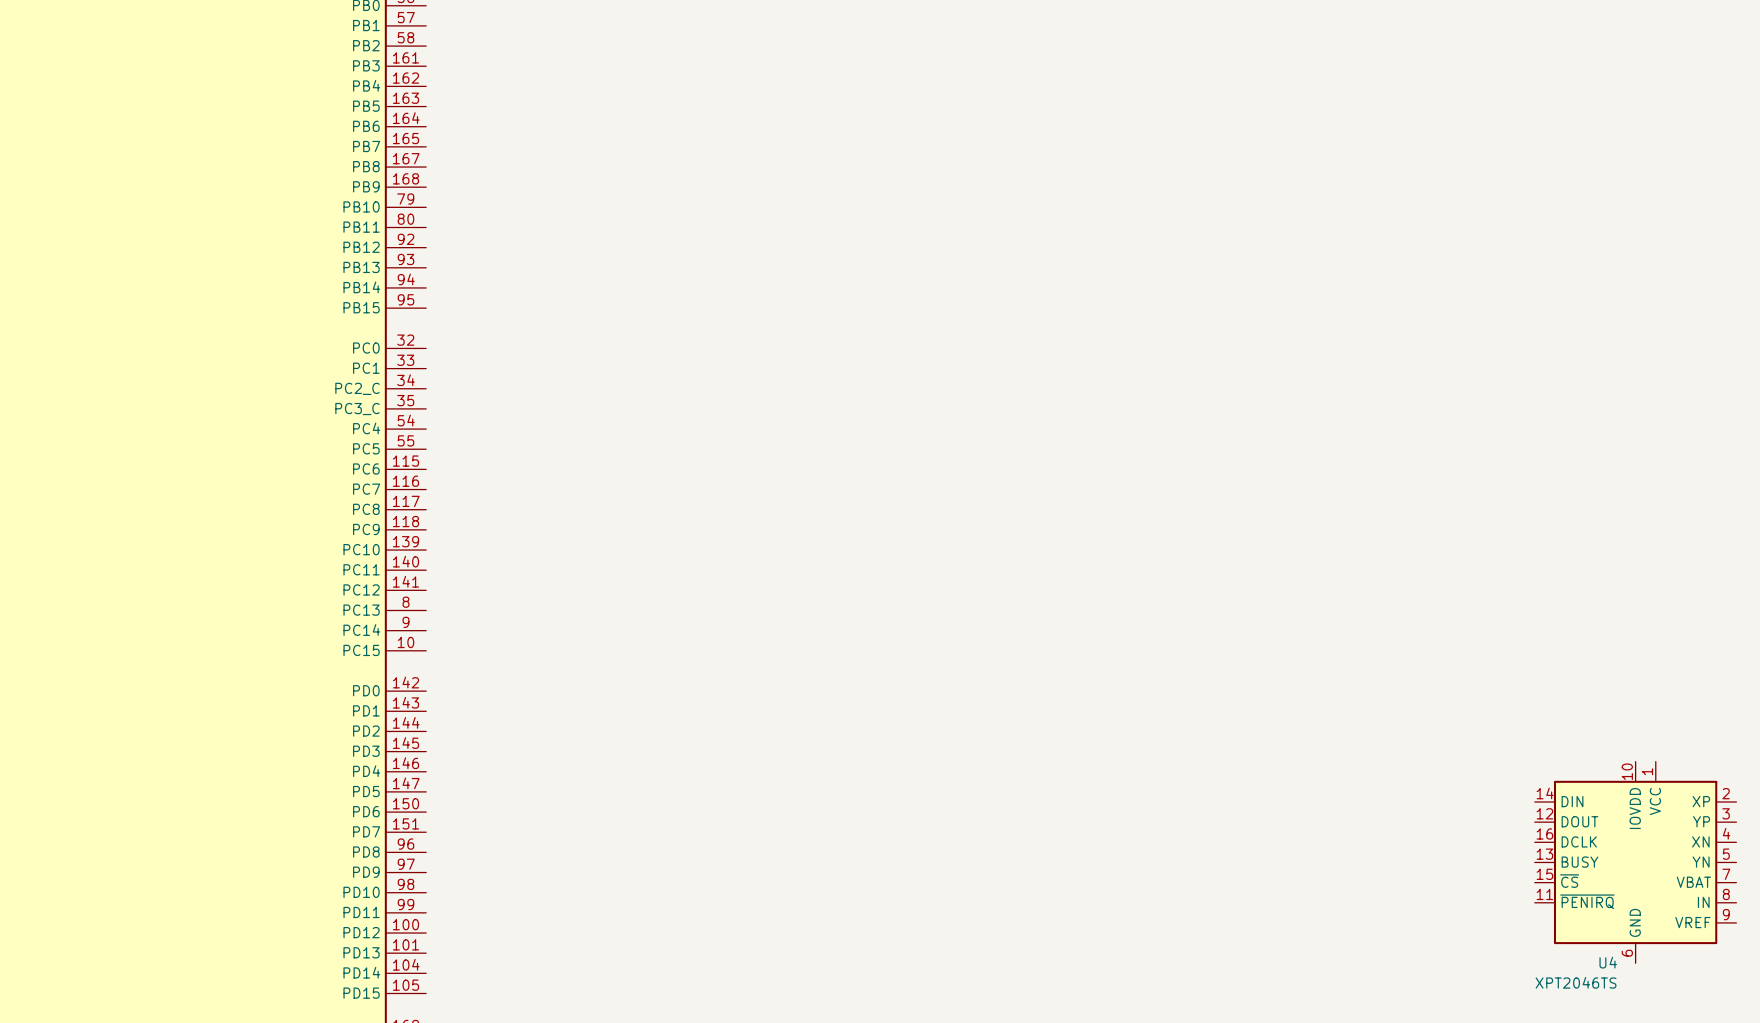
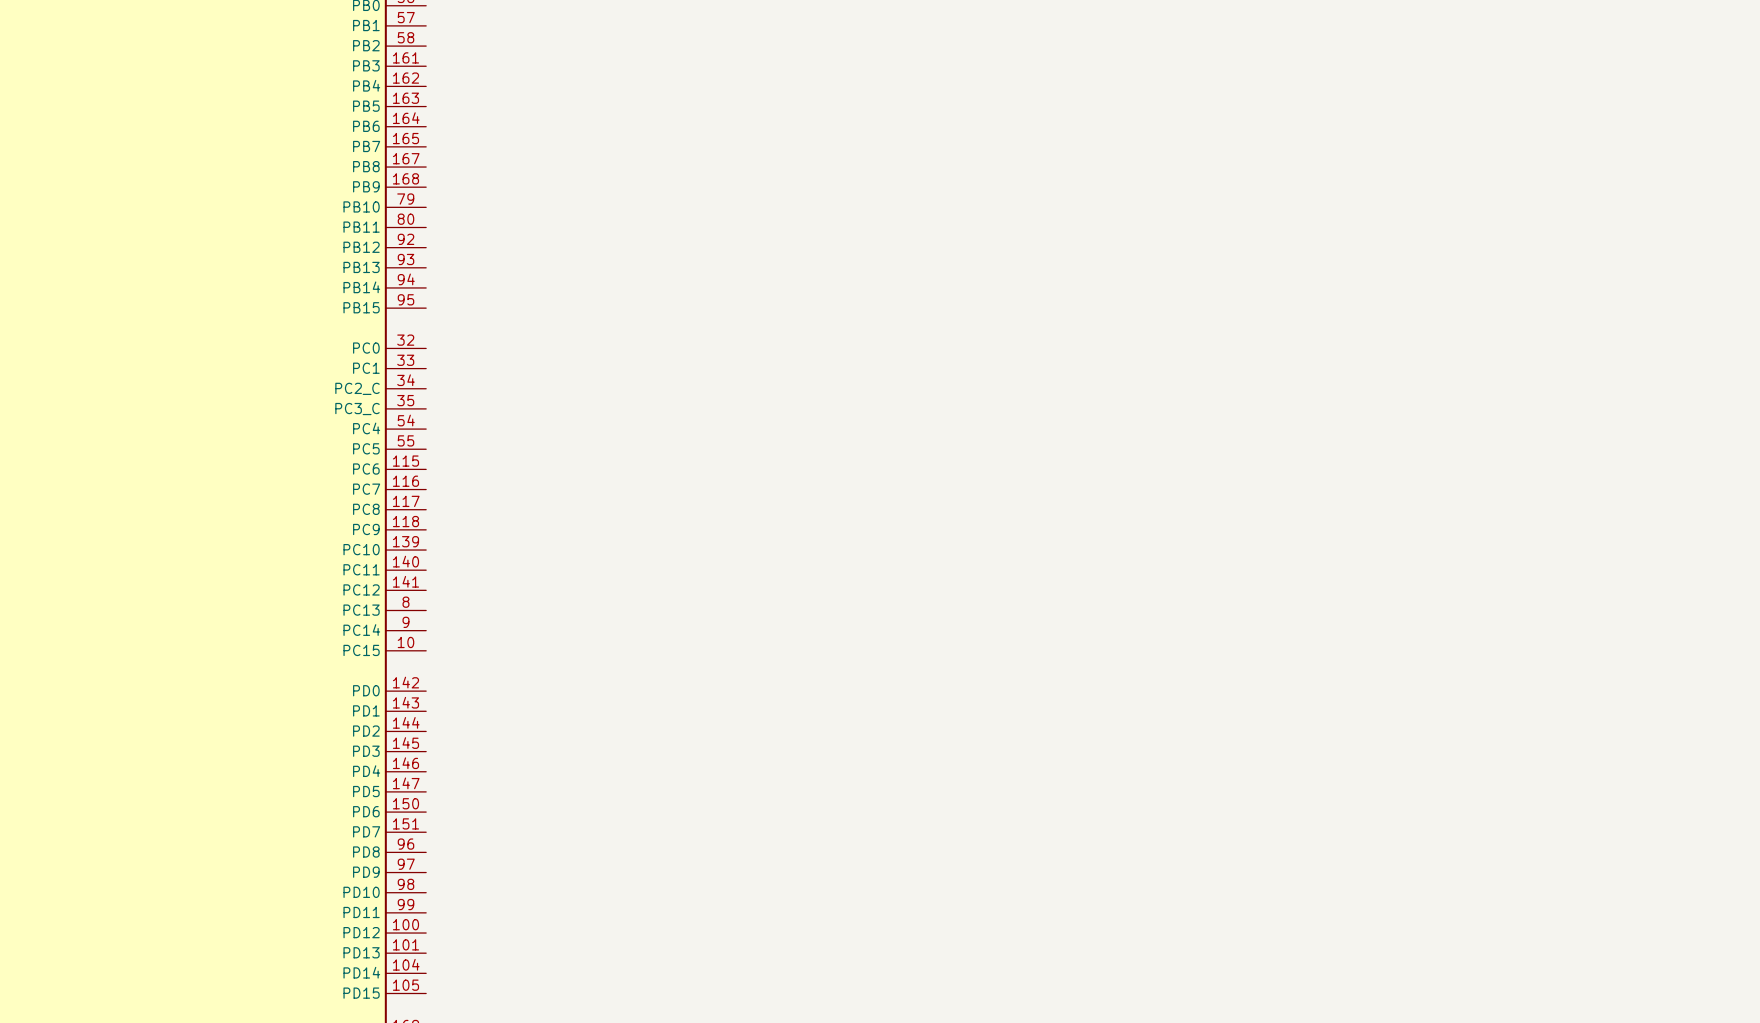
U4: XPT2046TS (1635, 862) -> none

